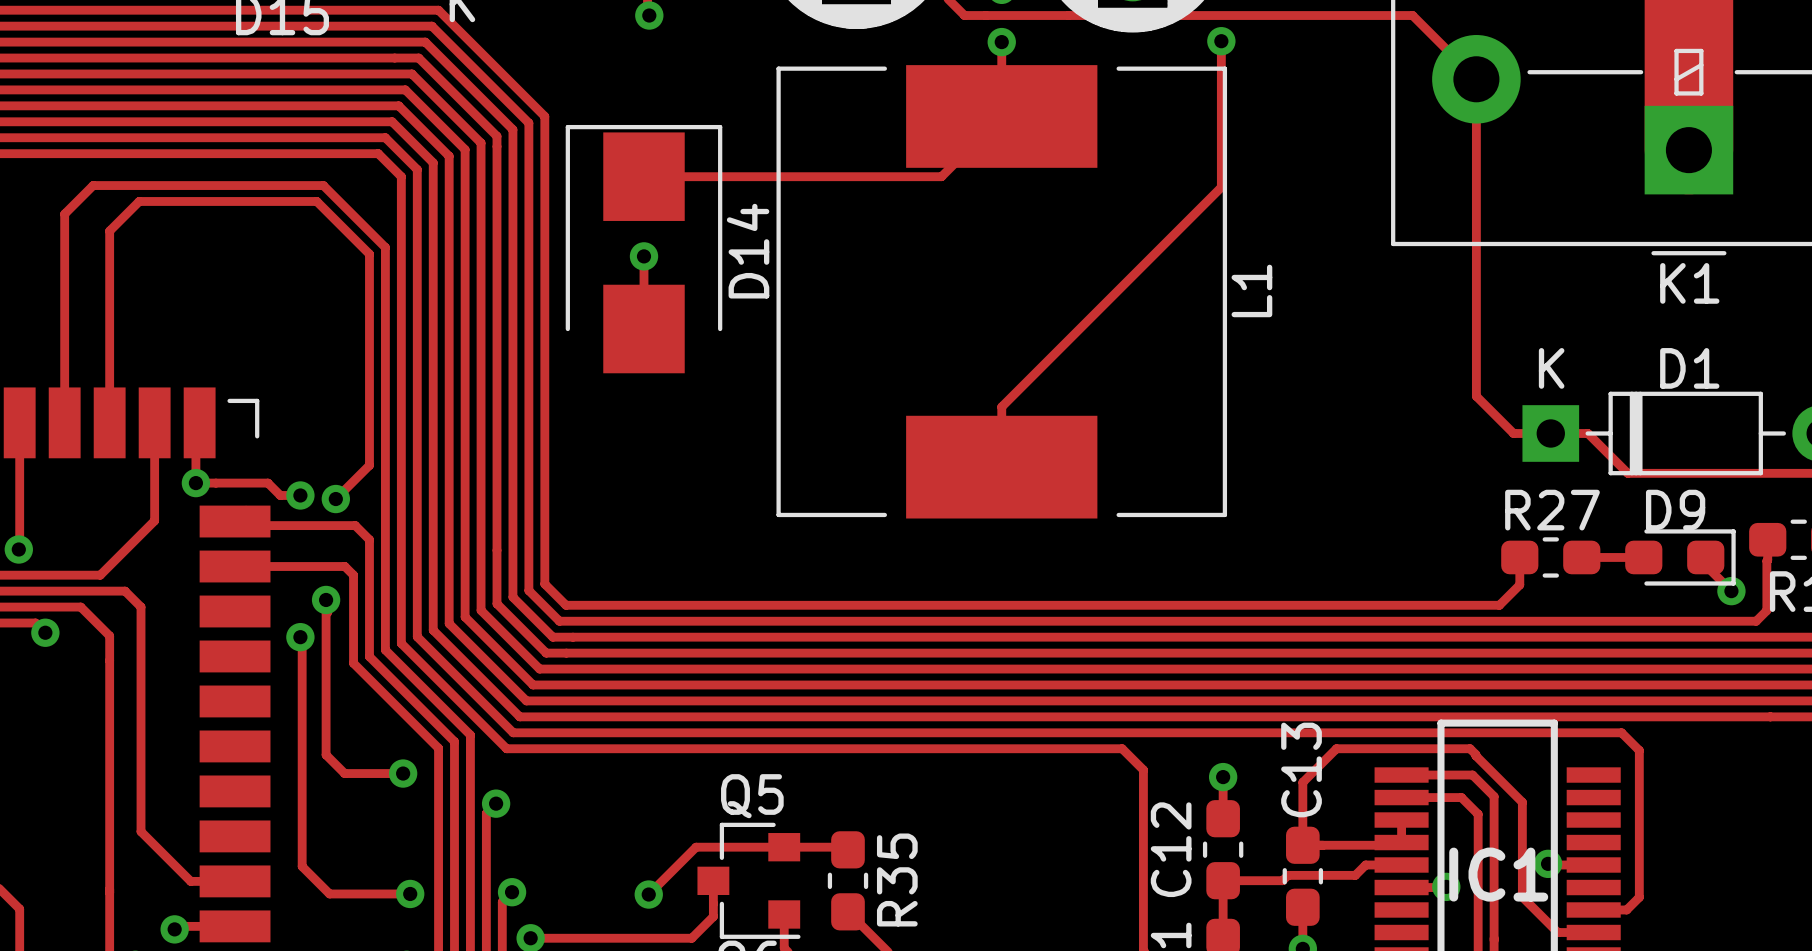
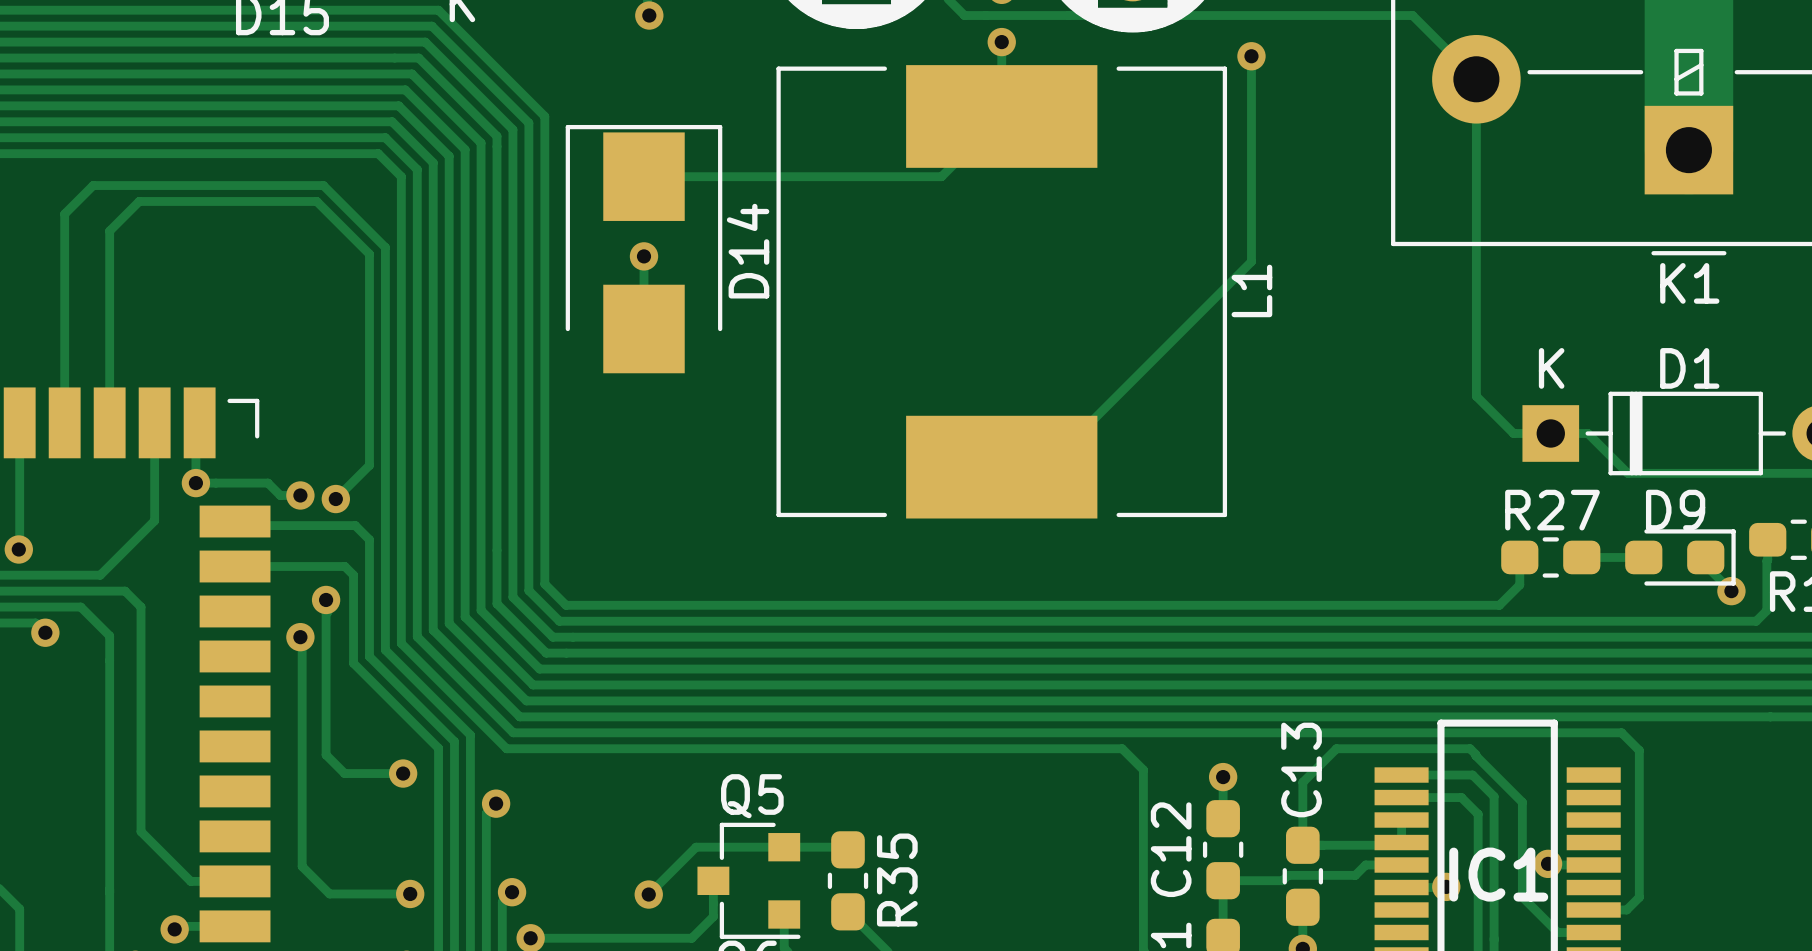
track: (1221, 41) (1221, 187) (1001, 406) (1001, 467) -> none
via: (1221, 41) -> none
track: none -> (1251, 56) (1251, 261) (1046, 467)
via: none -> (1251, 56)

